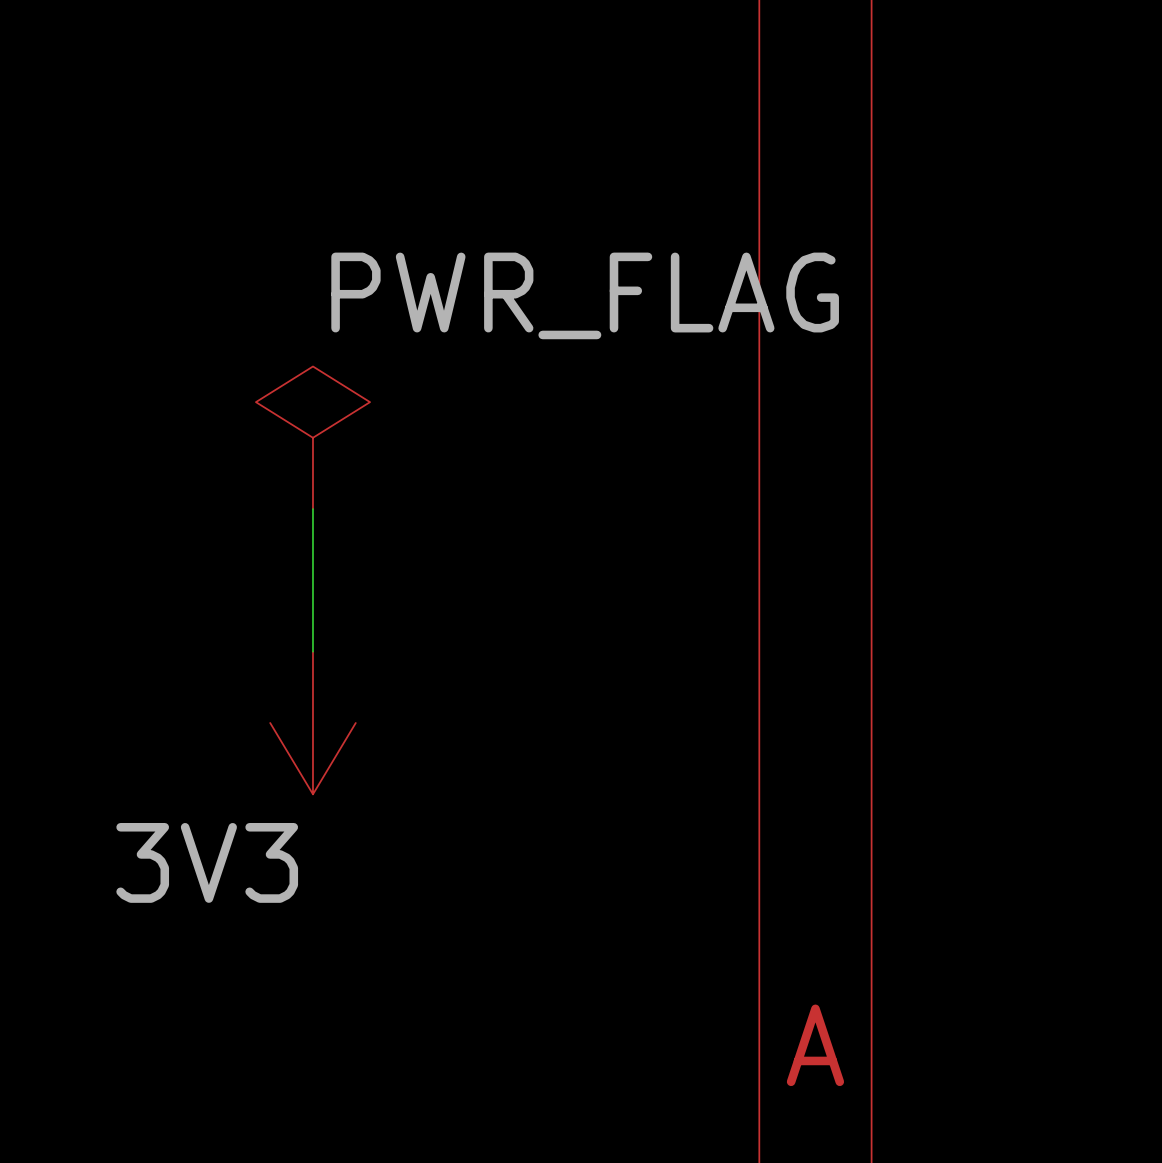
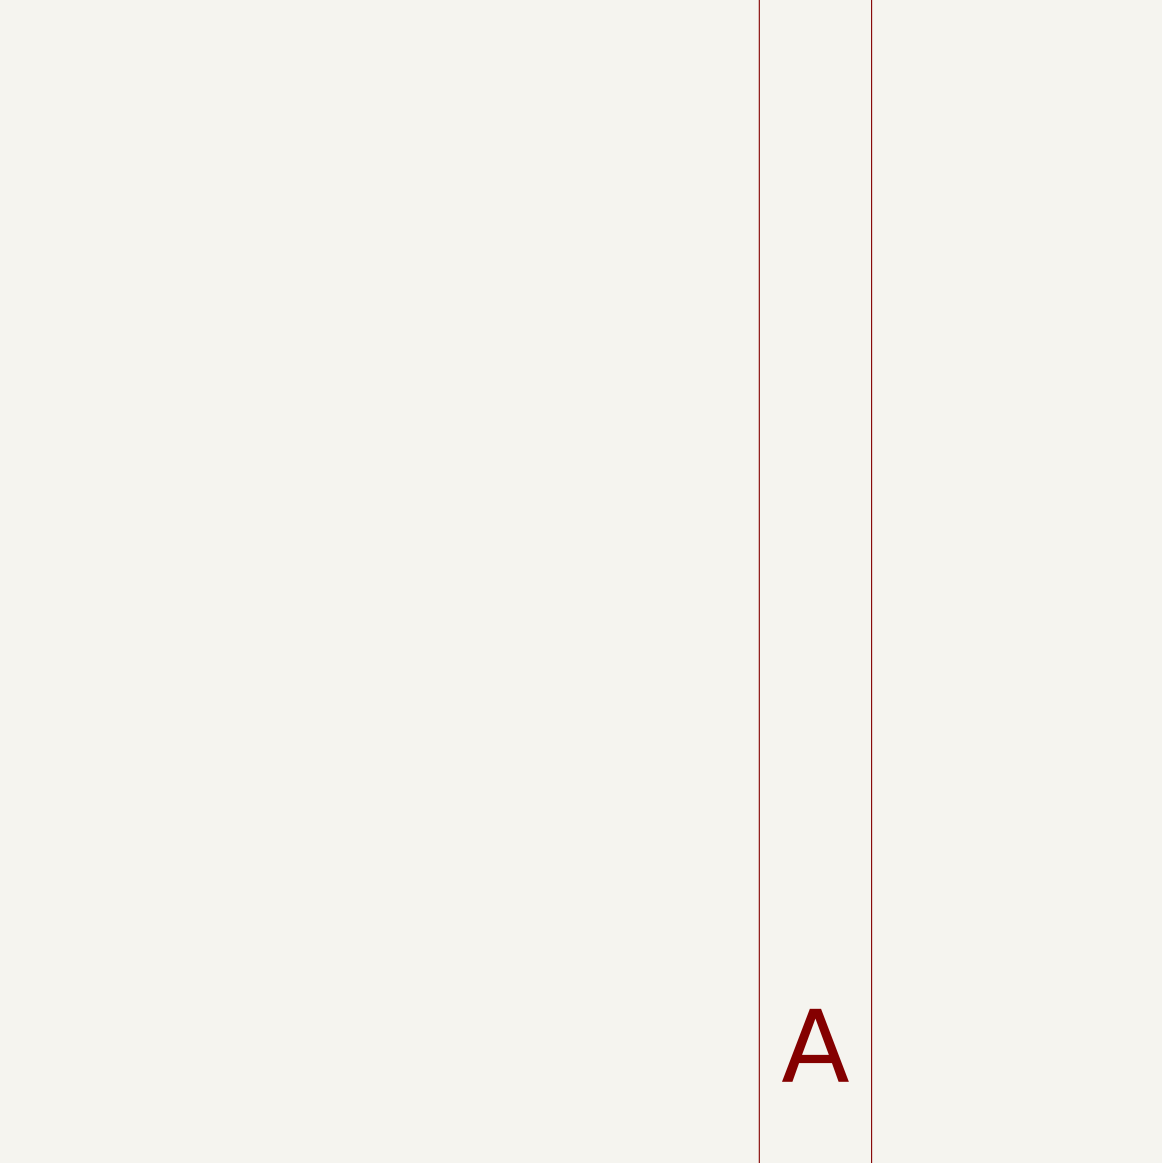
power symbol: PWR_FLAG (312, 437) -> none
wire: (312, 509) (312, 651) -> none
power symbol: 3V3 (312, 722) -> none

